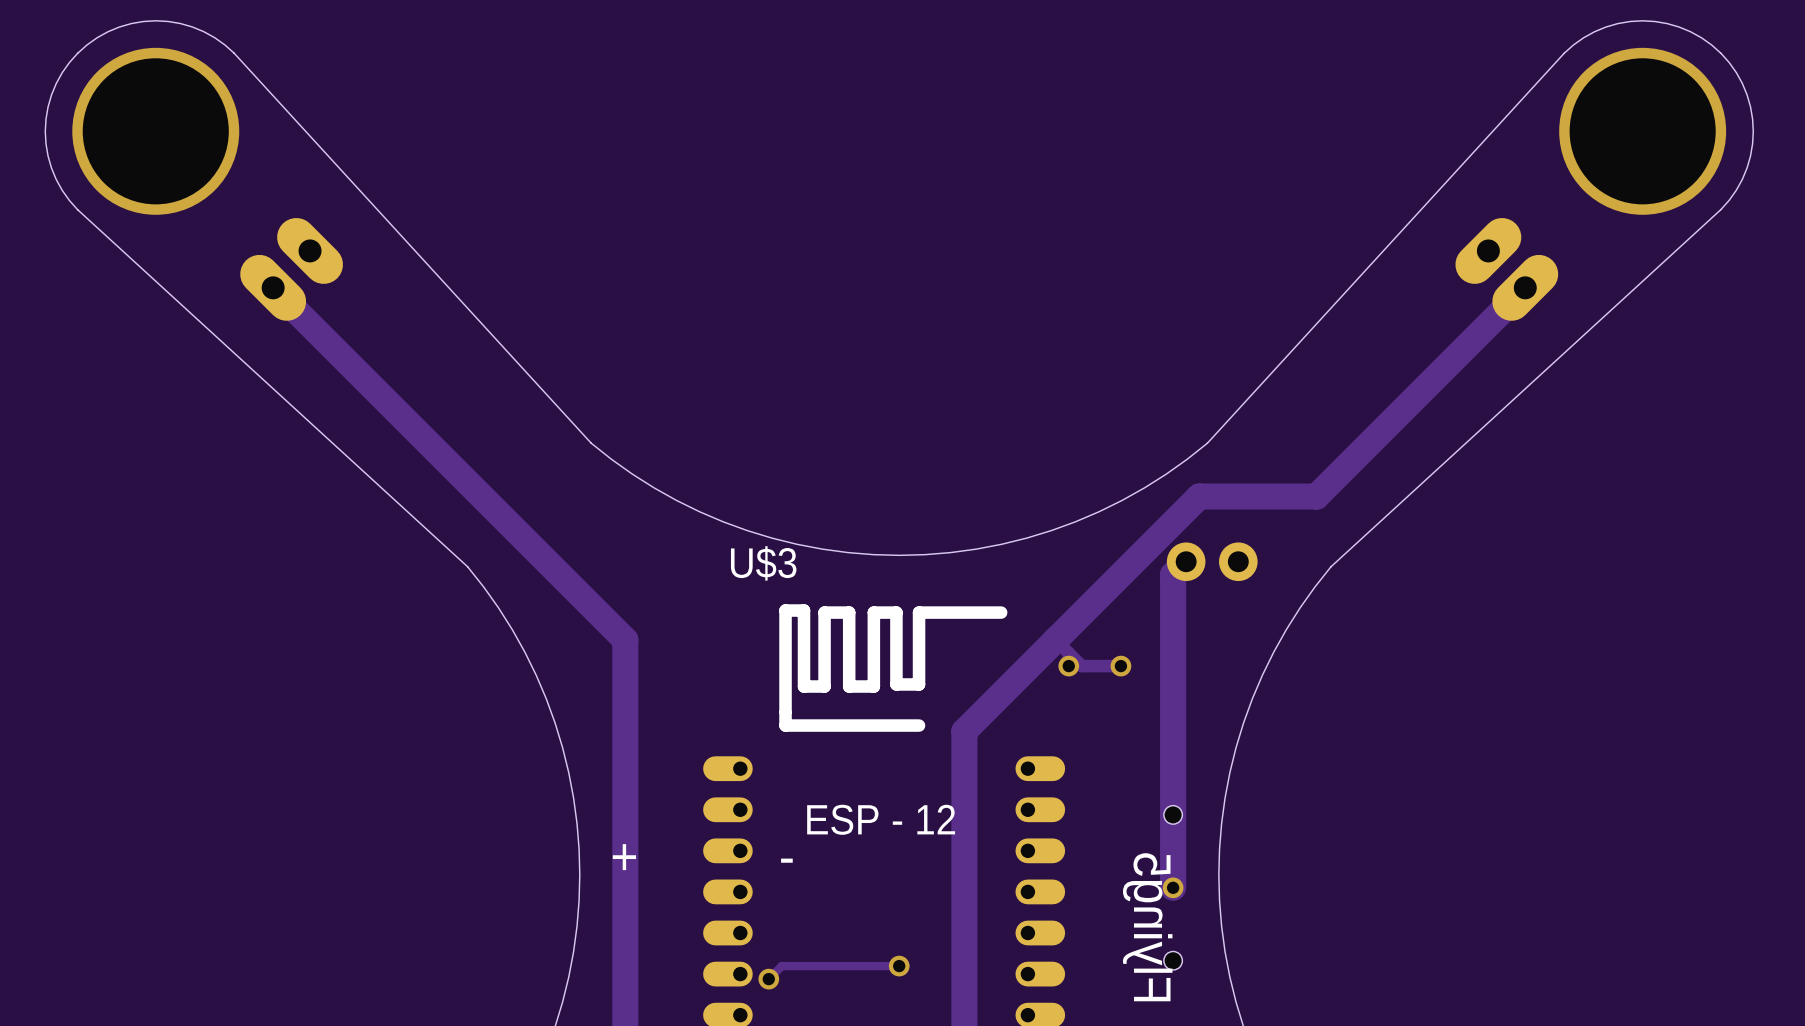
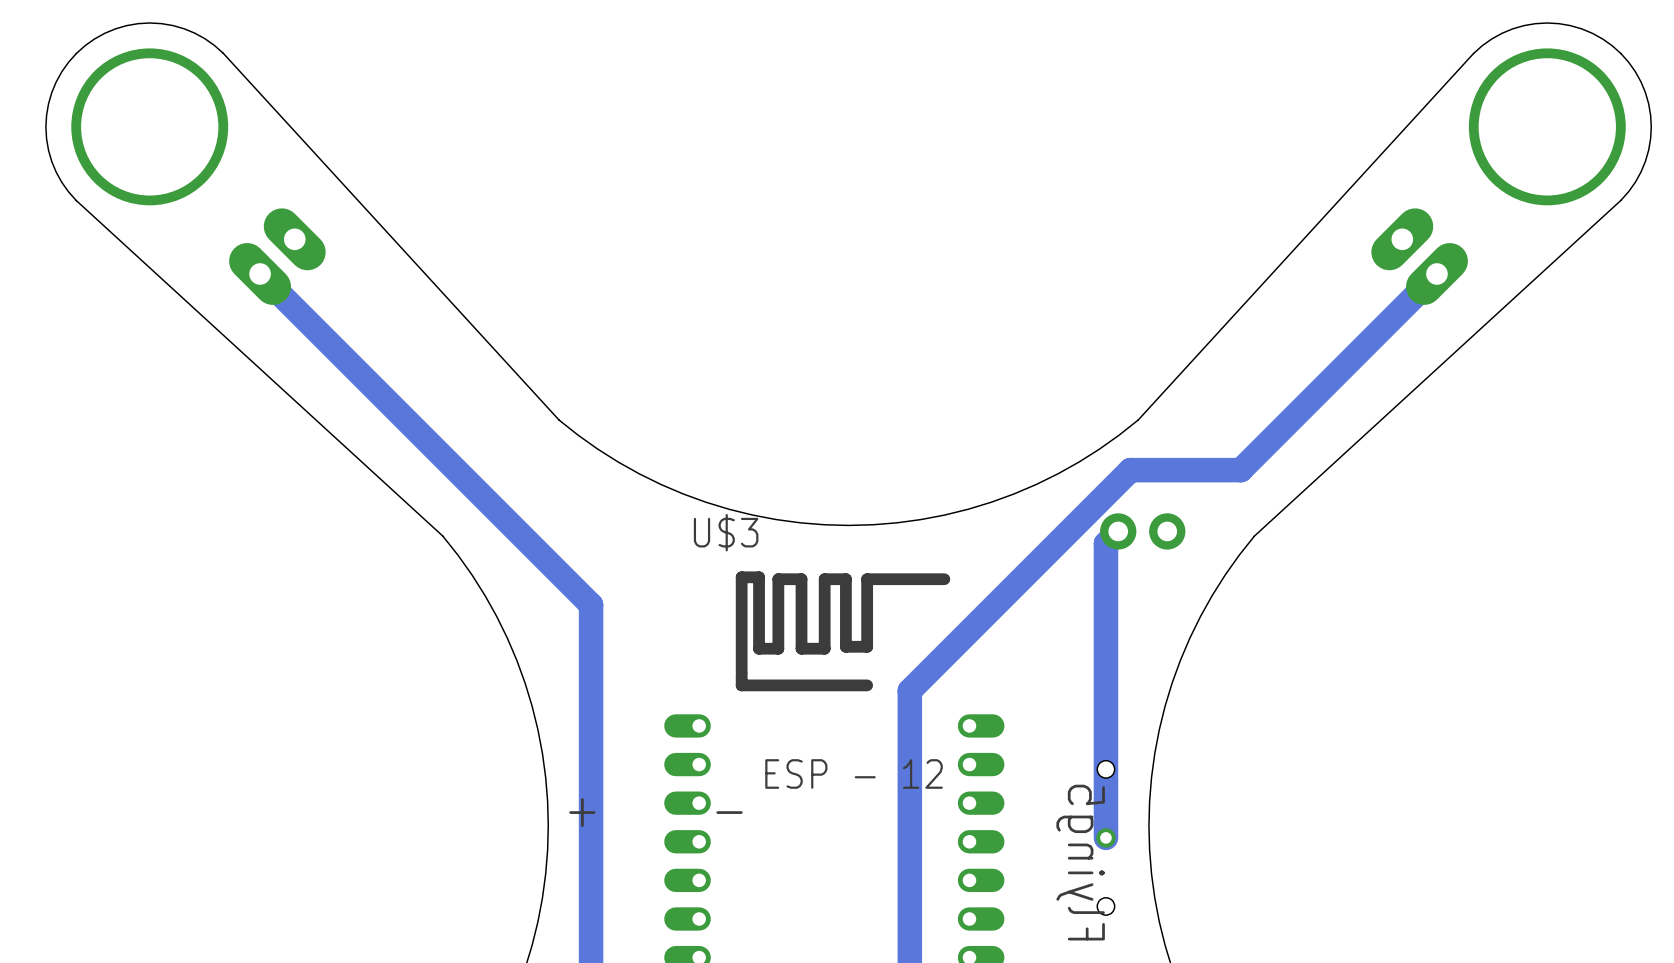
track: (1055, 640) (1081, 666) (1120, 666) -> none
via: (1068, 666) -> none
via: (1120, 666) -> none
track: (899, 966) (781, 966) (768, 979) -> none
via: (899, 966) -> none
via: (768, 979) -> none

